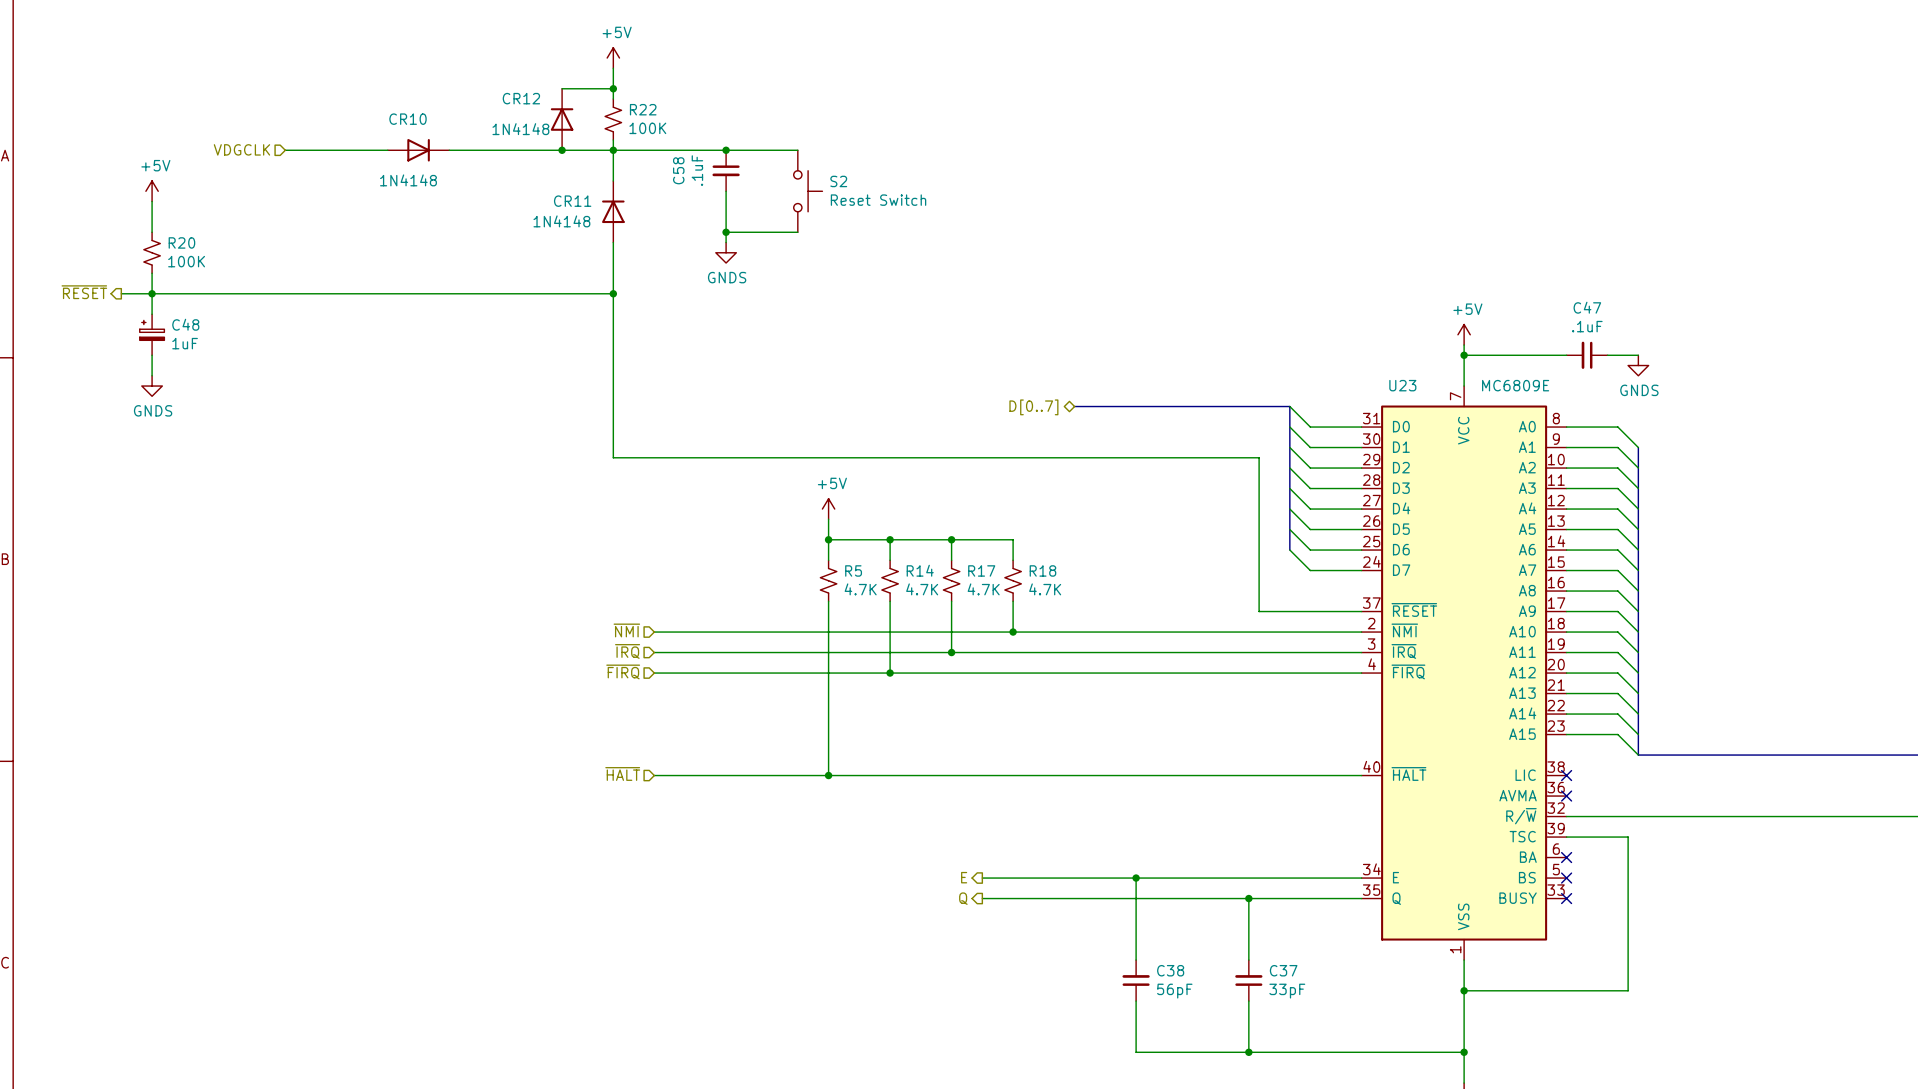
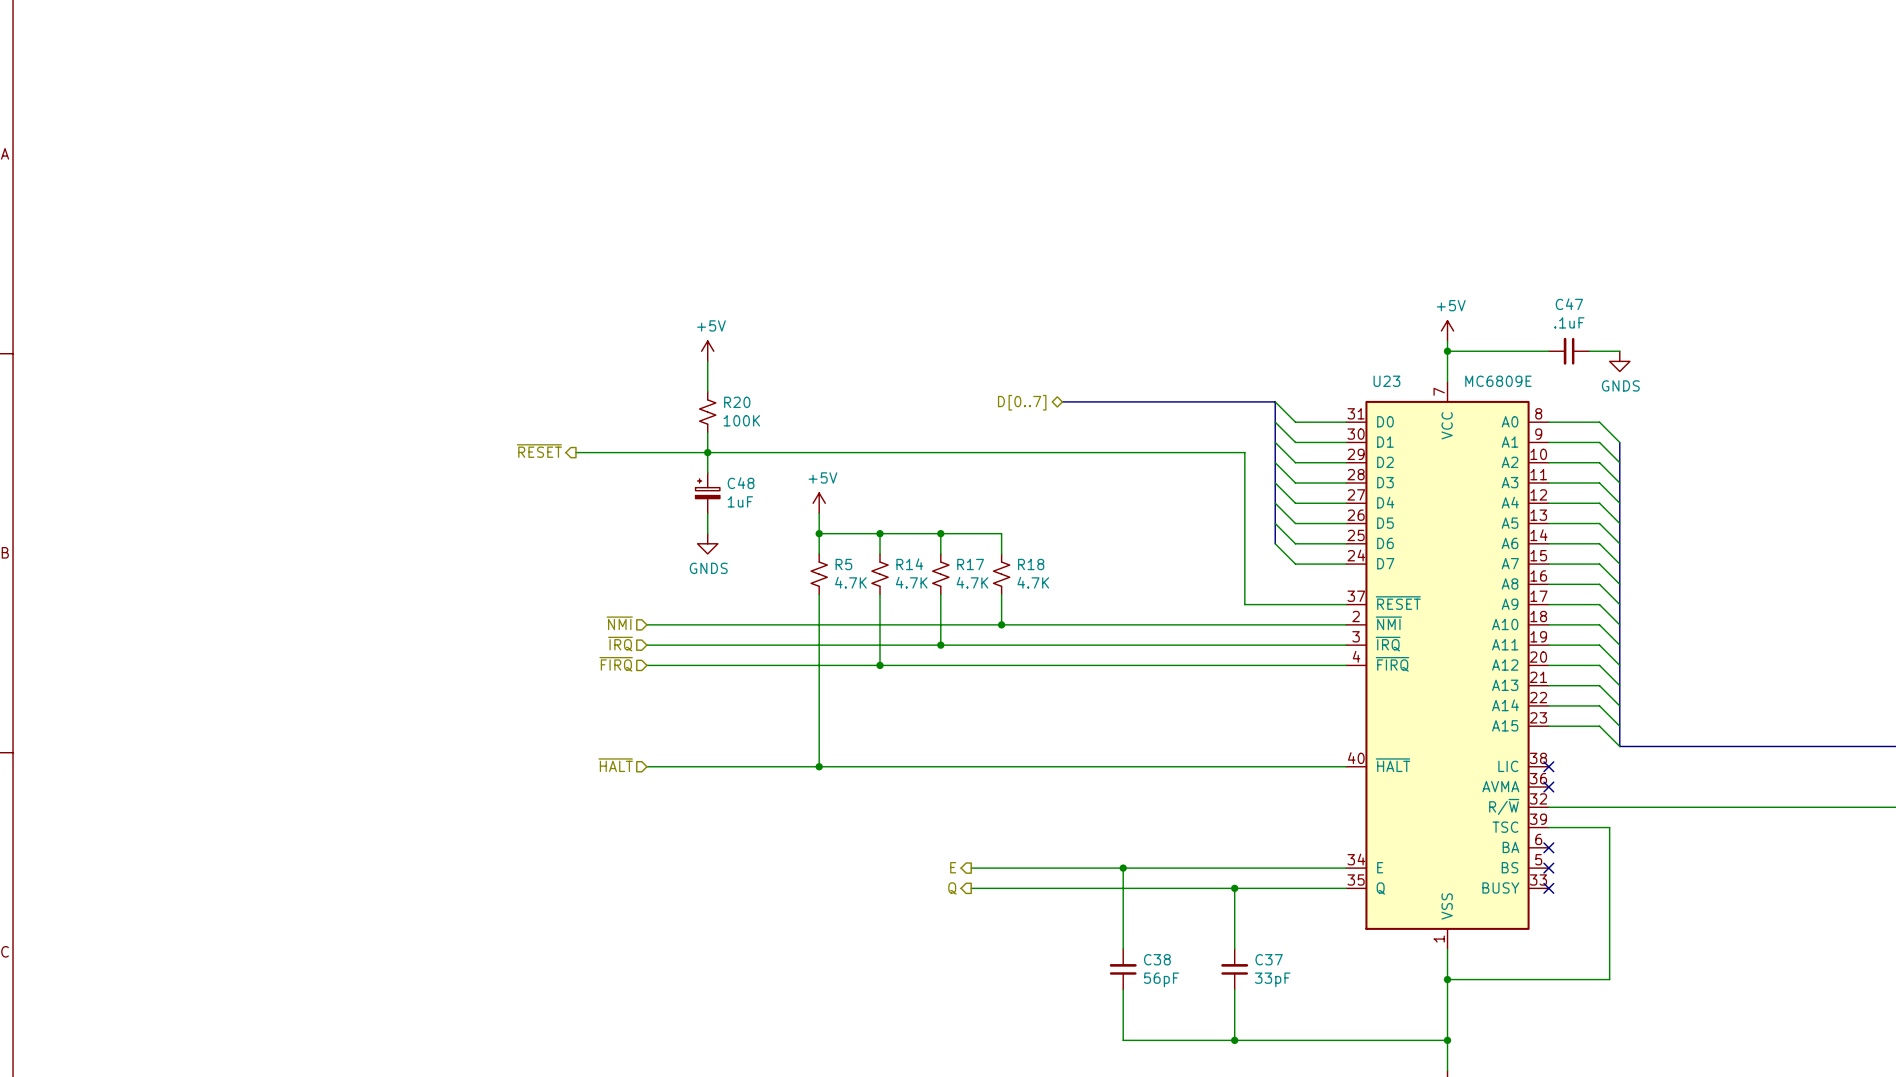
power symbol: +5V (613, 58) -> none
wire: (613, 68) (613, 99) -> none
wire: (562, 88) (613, 88) -> none
junction: (613, 88) -> none
CR12: 1N4148 (562, 119) -> none
R22: 100K (613, 119) -> none
wire: (613, 140) (613, 181) -> none
hierarchical label: VDGCLK (241, 149) -> none
wire: (285, 150) (387, 150) -> none
CR10: 1N4148 (418, 150) -> none
wire: (449, 150) (797, 150) -> none
junction: (562, 150) -> none
junction: (613, 150) -> none
junction: (726, 150) -> none
C58: .1uF (726, 170) -> none
power symbol: +5V (152, 191) -> none
wire: (726, 191) (726, 242) -> none
S2: Reset Switch (808, 191) -> none
wire: (152, 201) (152, 232) -> none
CR11: 1N4148 (613, 211) -> none
wire: (726, 232) (797, 232) -> none
junction: (726, 232) -> none
wire: (613, 242) (613, 457) -> (575, 452) (606, 452)
R20 position: (152, 252) -> (707, 412)
power symbol: GNDS (726, 252) -> none
wire: (152, 273) (152, 314) -> none
hierarchical label: ~{RESET} (84, 292) -> none
wire: (121, 293) (613, 293) -> none
junction: (152, 293) -> none
junction: (613, 293) -> none
C48 position: (152, 334) -> (707, 493)
wire: (152, 355) (152, 375) -> none
power symbol: none -> +5V (707, 351)
wire: none -> (707, 361) (707, 391)
power symbol: GNDS (152, 386) -> none
wire: none -> (707, 432) (707, 472)
hierarchical label: none -> ~{RESET} (539, 451)
junction: none -> (707, 452)
wire: none -> (707, 513) (707, 533)
power symbol: none -> GNDS (707, 543)

